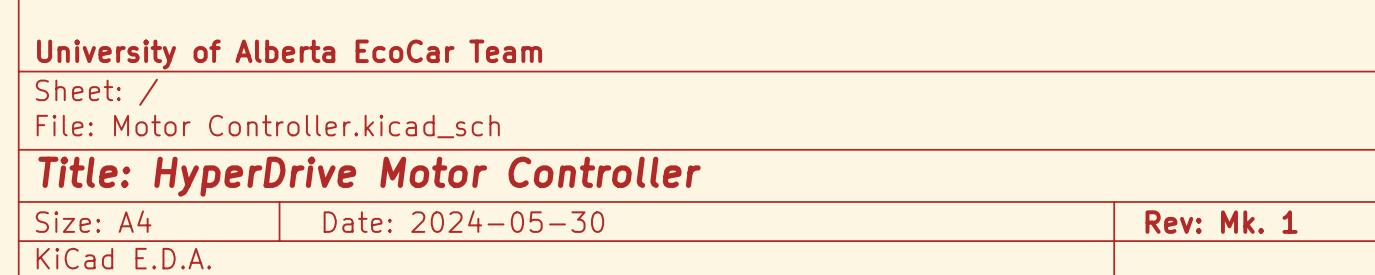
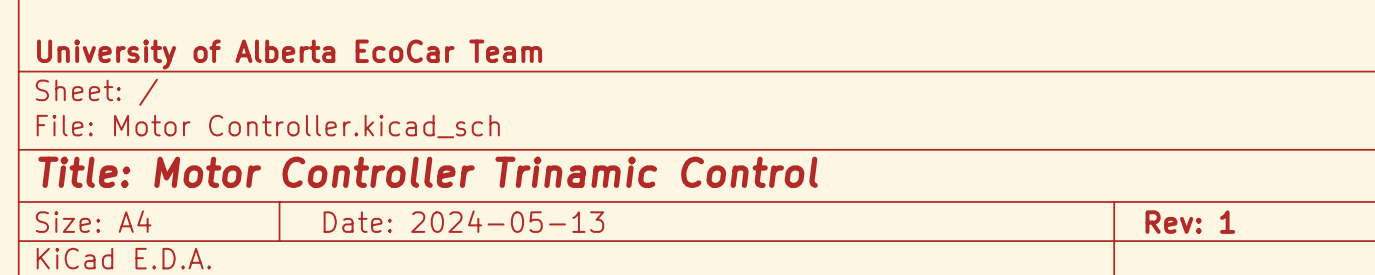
title block: Title: HyperDrive Motor Controller (369, 176) -> Title: Motor Controller Trinamic Control (428, 172)
title block: Date: 2024-05-30 (463, 221) -> Date: 2024-05-13 (463, 221)
title block: Rev: Mk. 1 (1221, 222) -> Rev: 1 (1190, 222)

